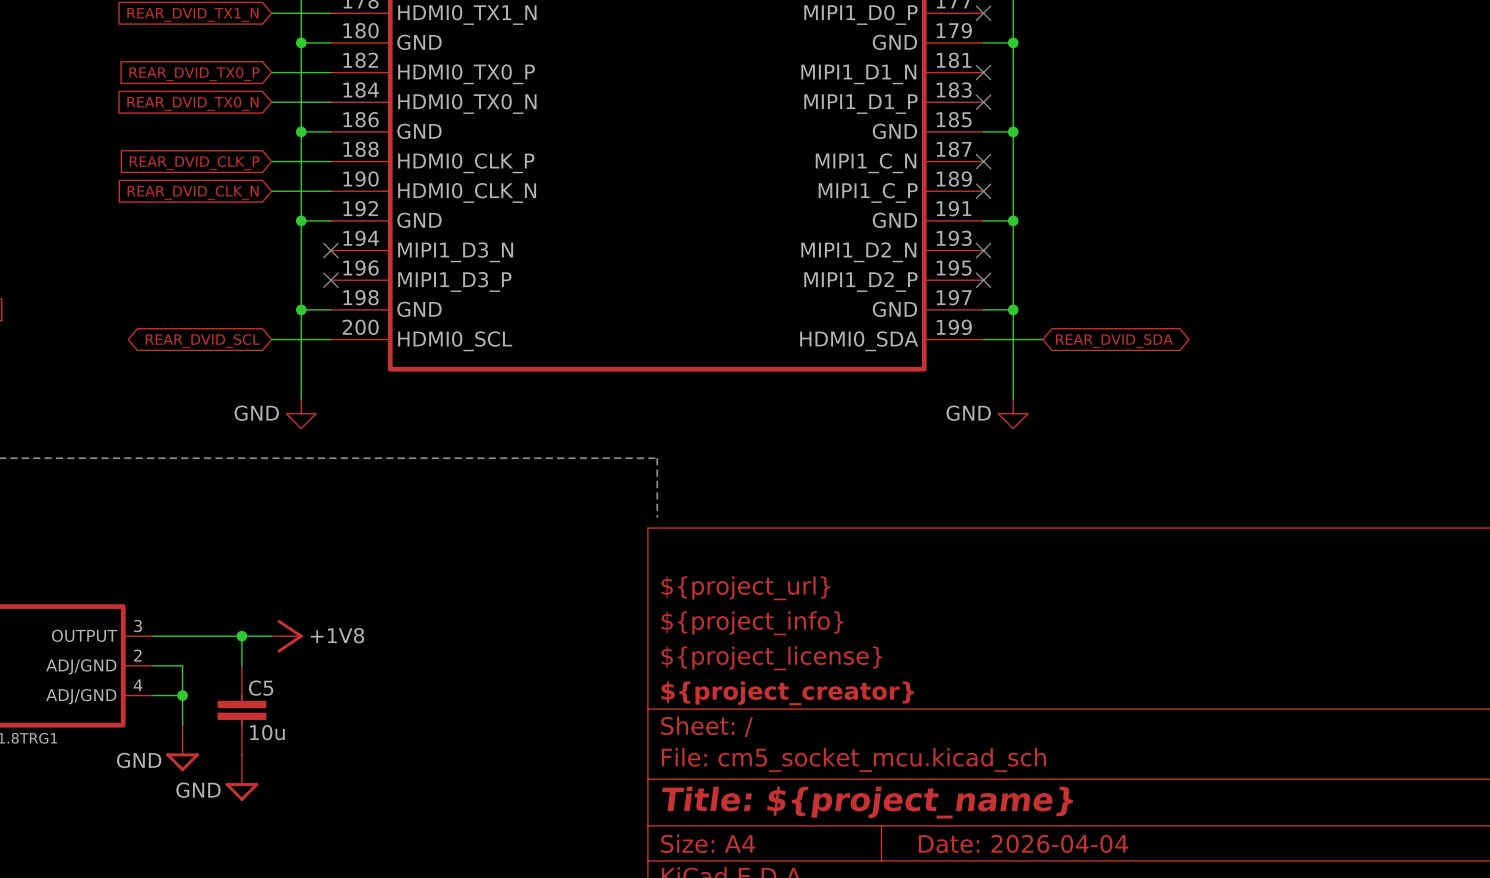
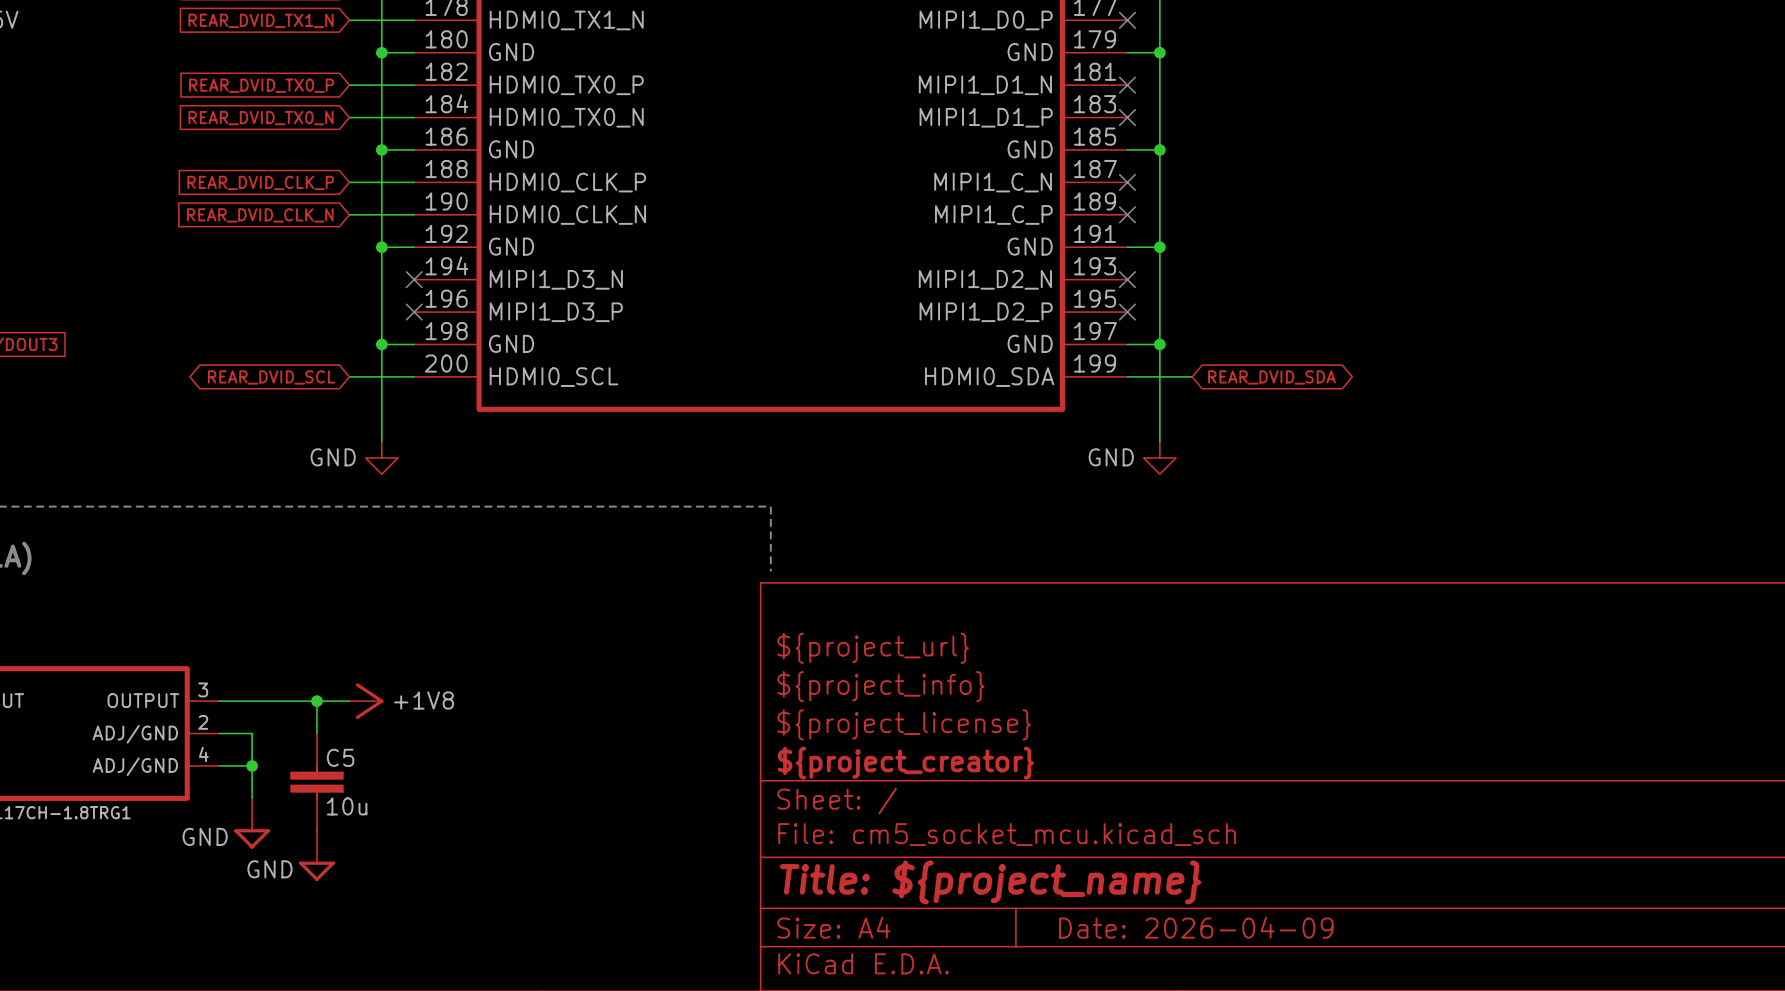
title block: Date: 2026-04-04 (1023, 843) -> Date: 2026-04-09 (1196, 927)

